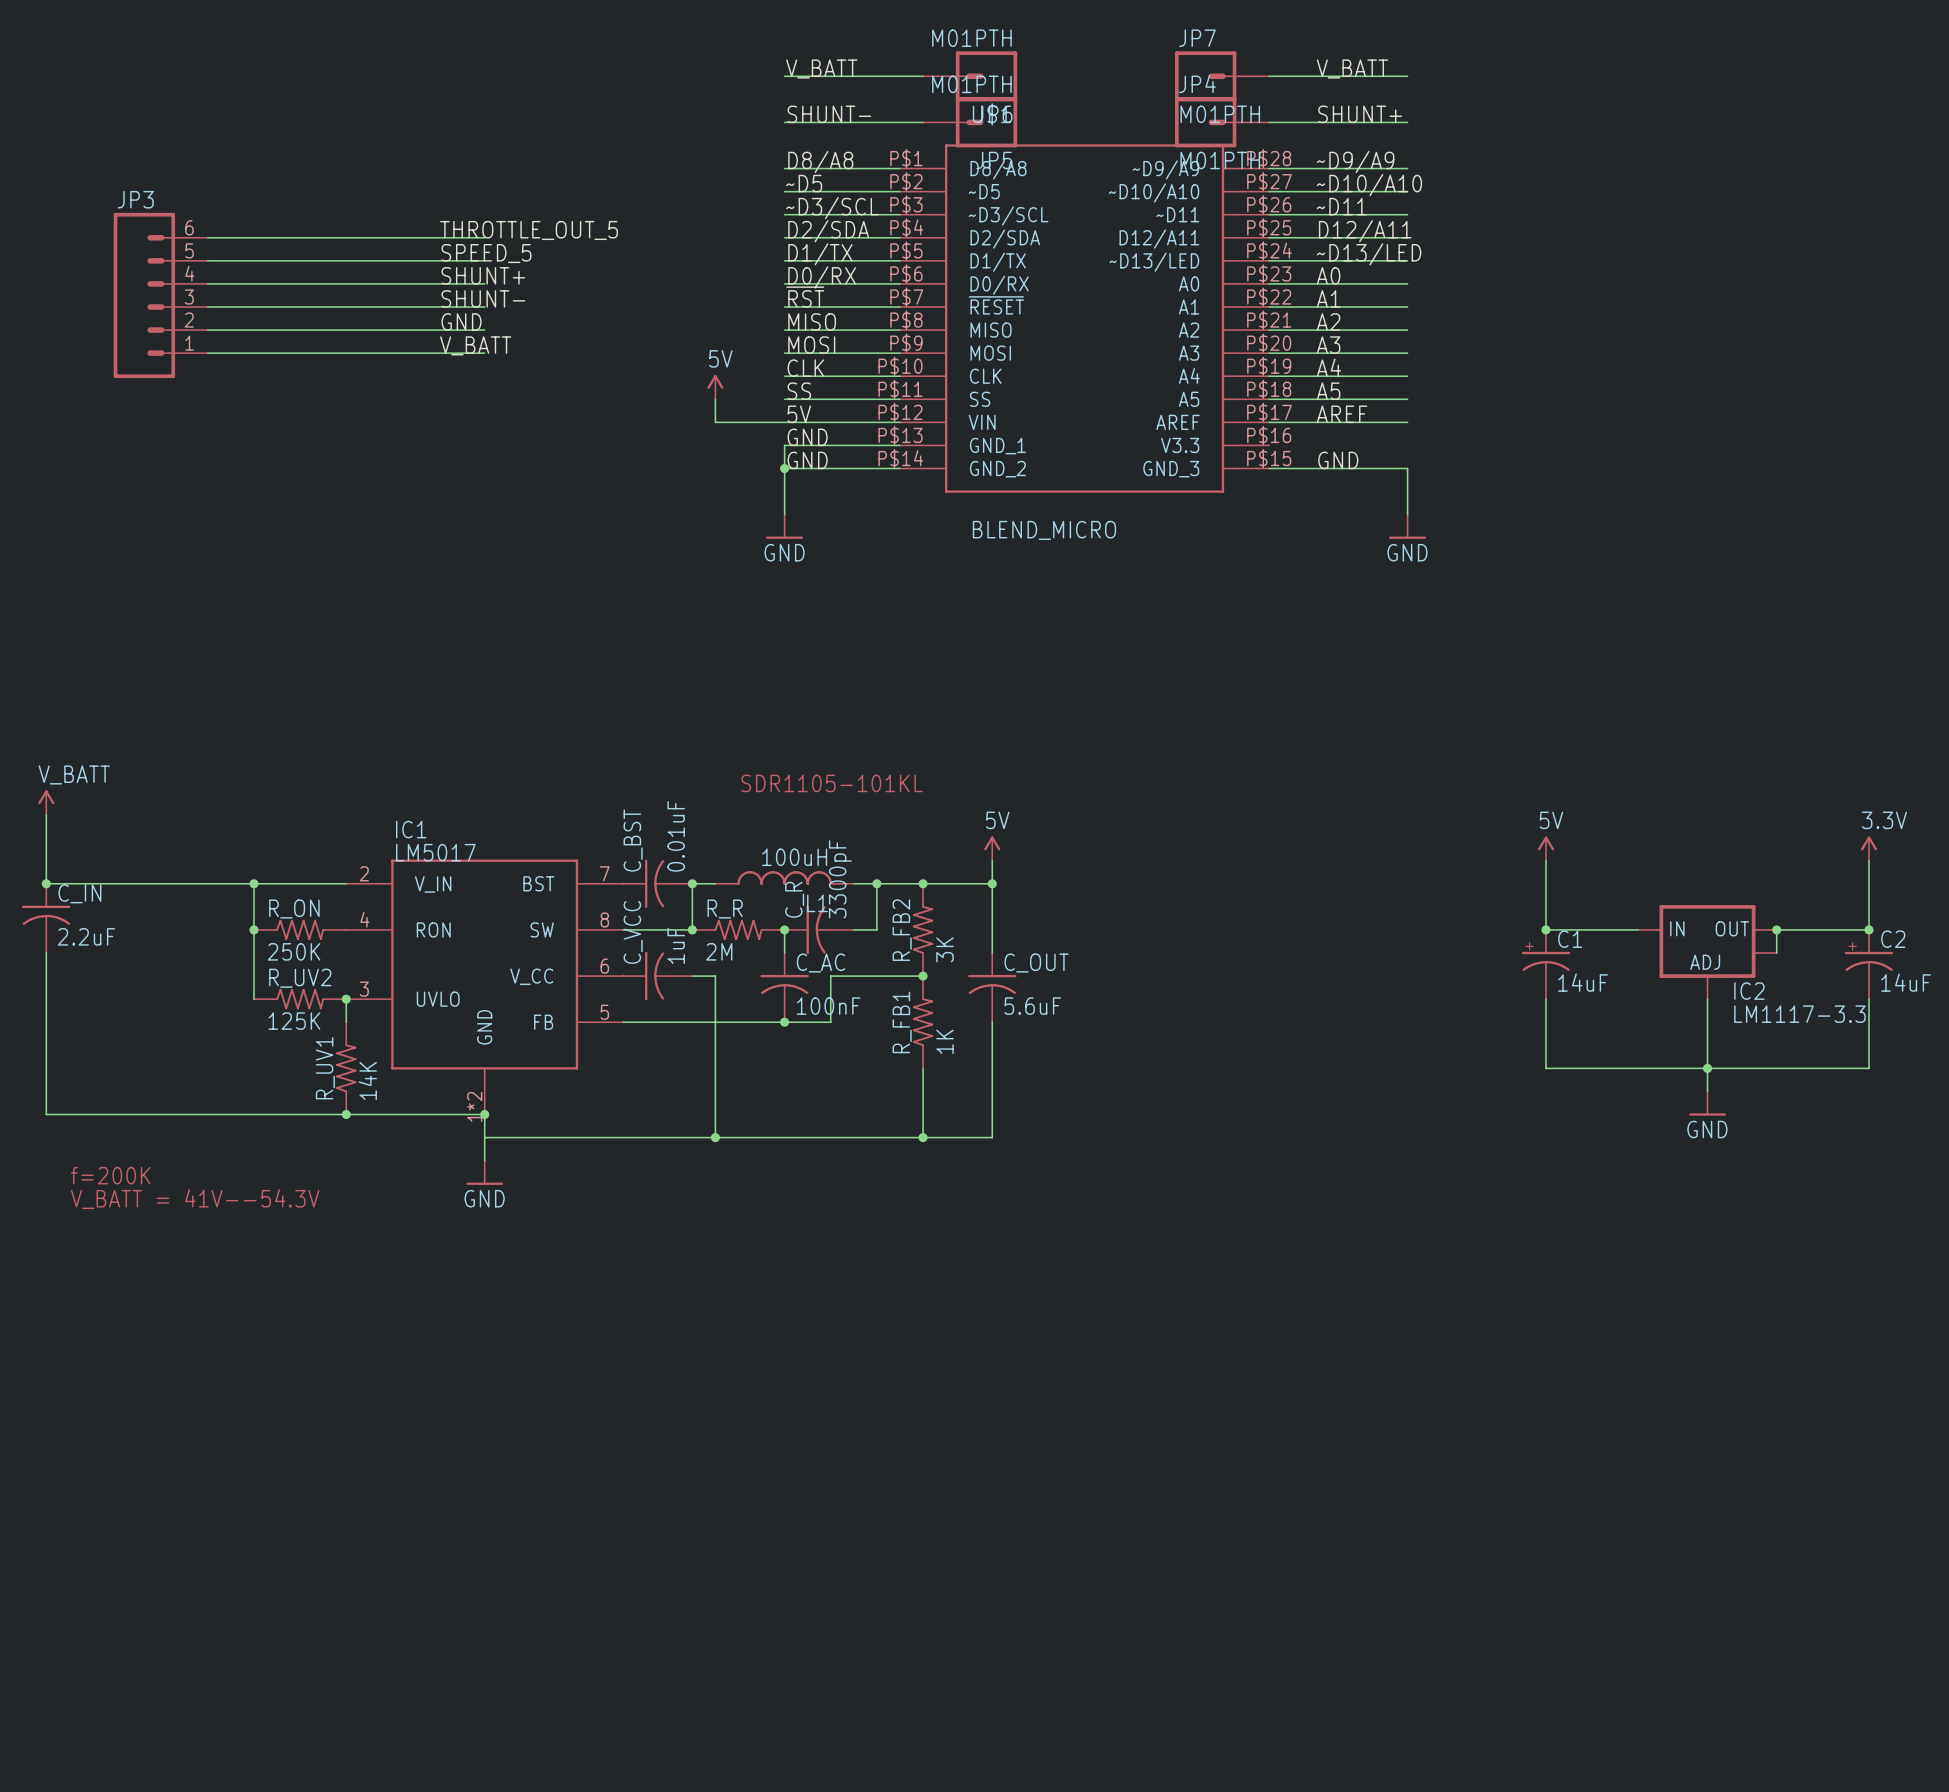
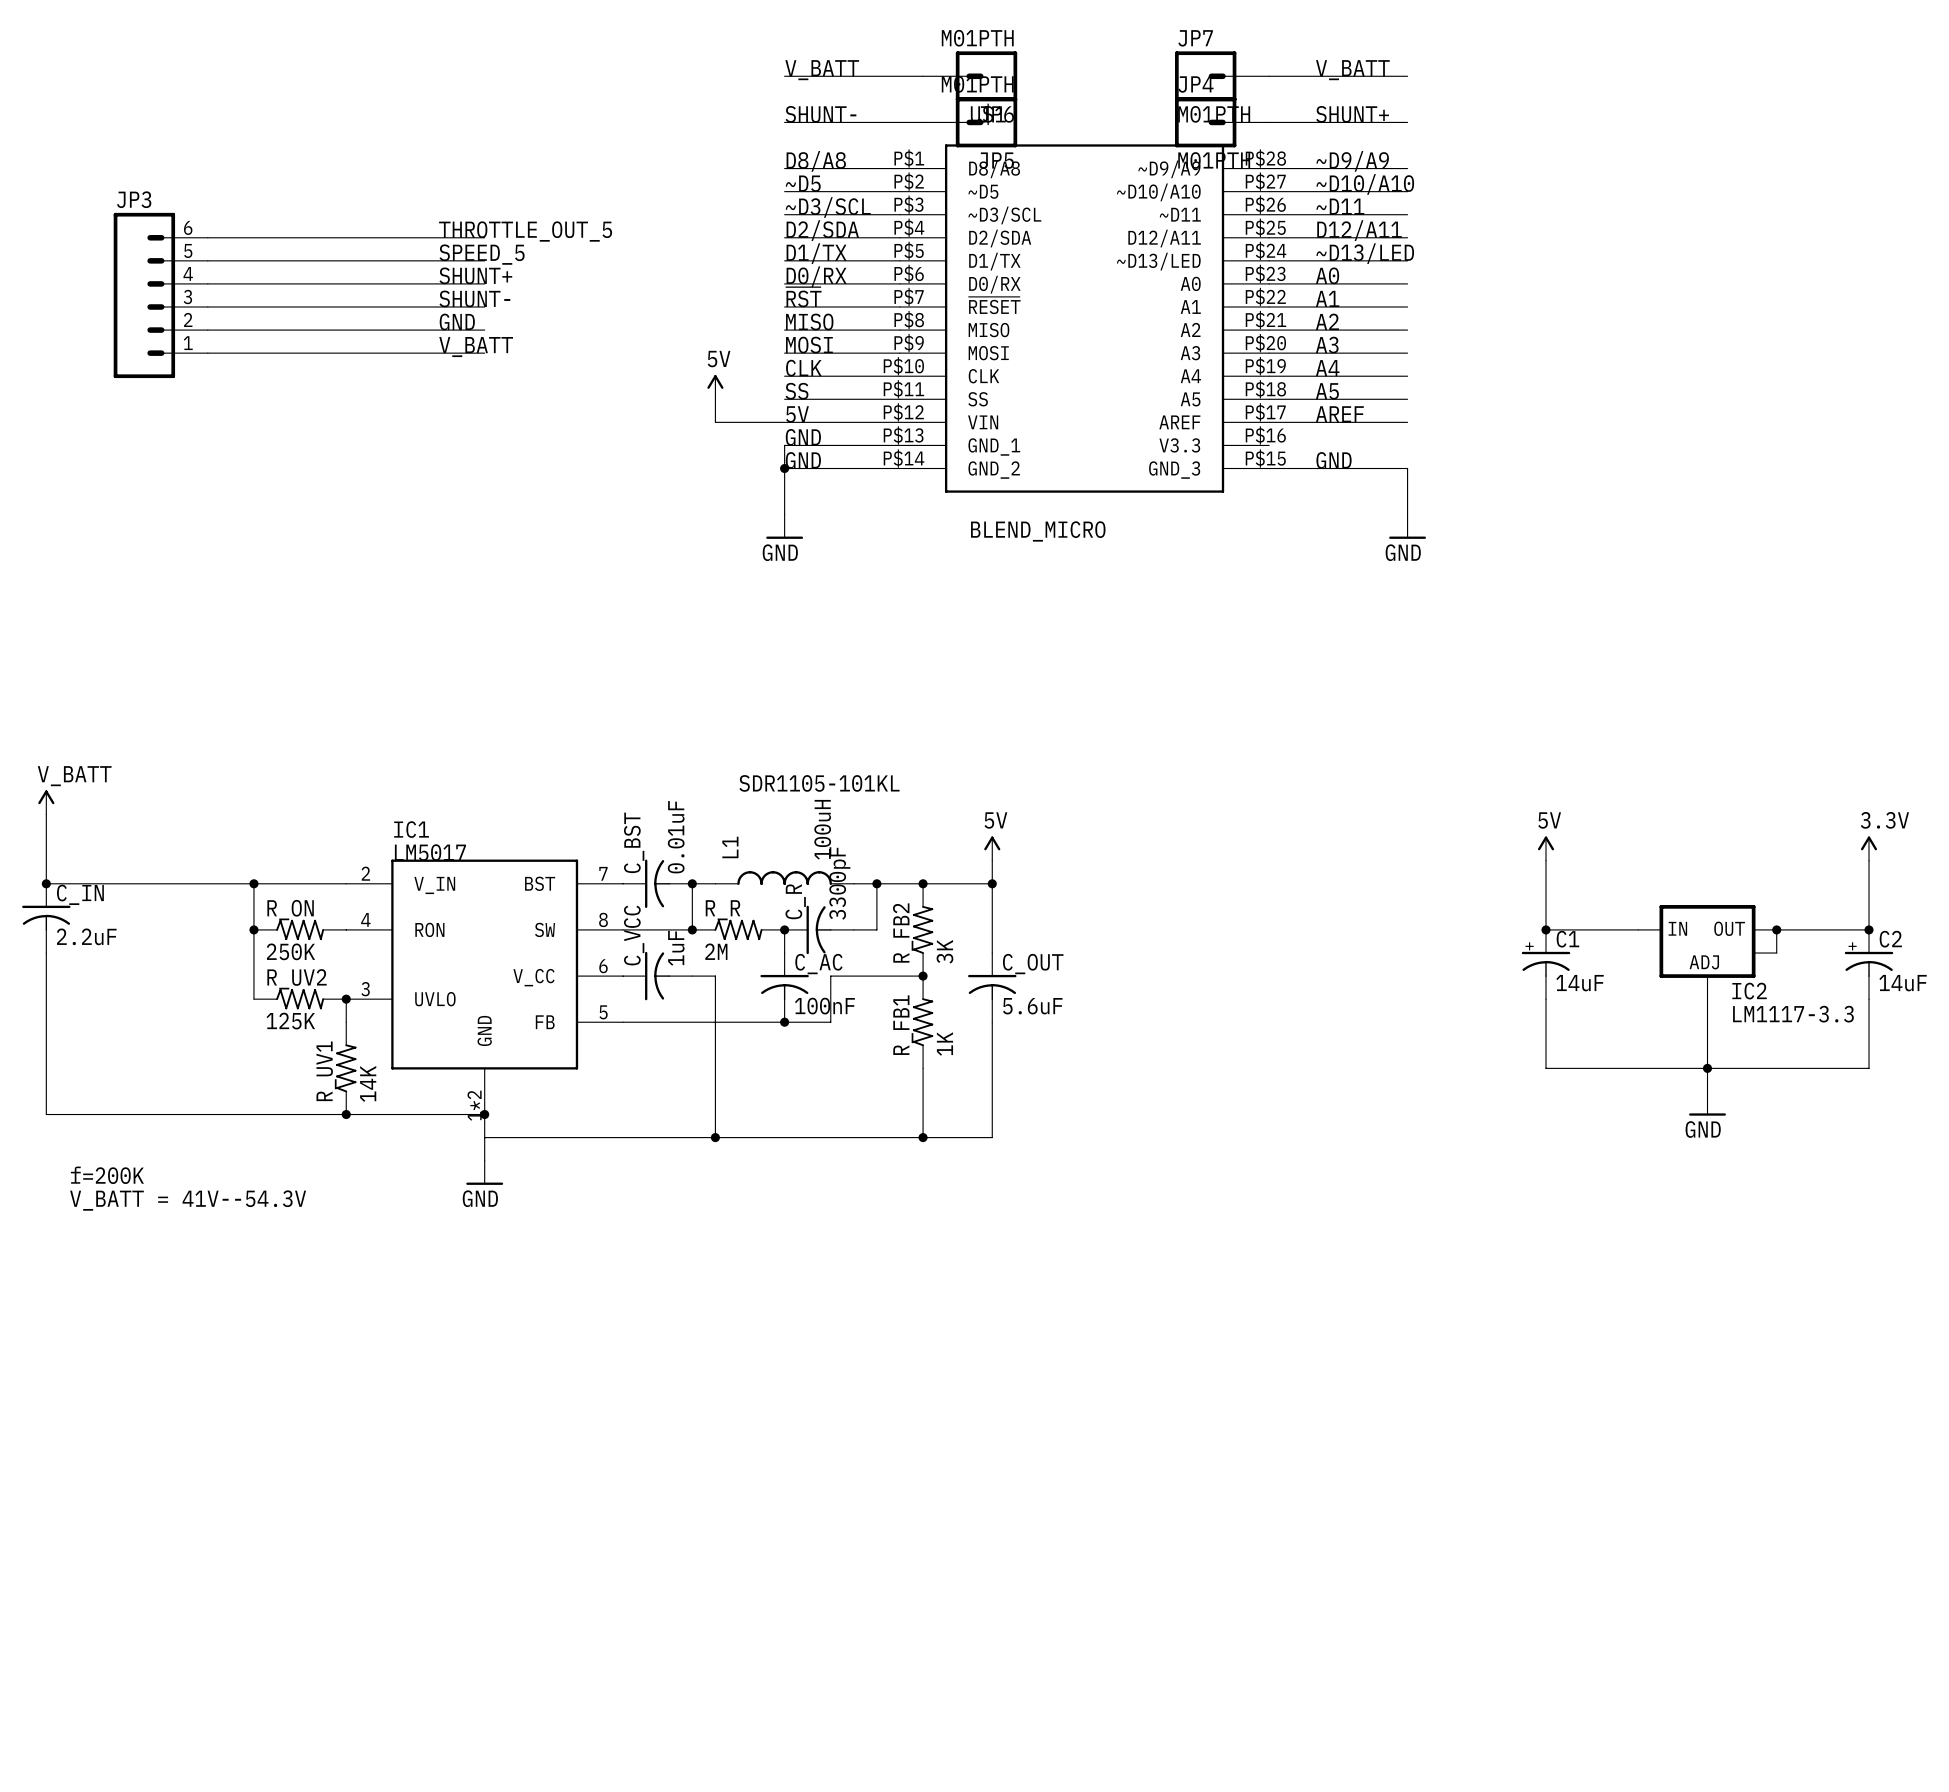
L1 value rotation: 0° (794, 857) -> 90° counterclockwise (822, 829)
L1 name rotation: 0° (817, 903) -> 90° counterclockwise (730, 847)
L1 name position: L1 (817, 903) -> L1 (730, 847)

